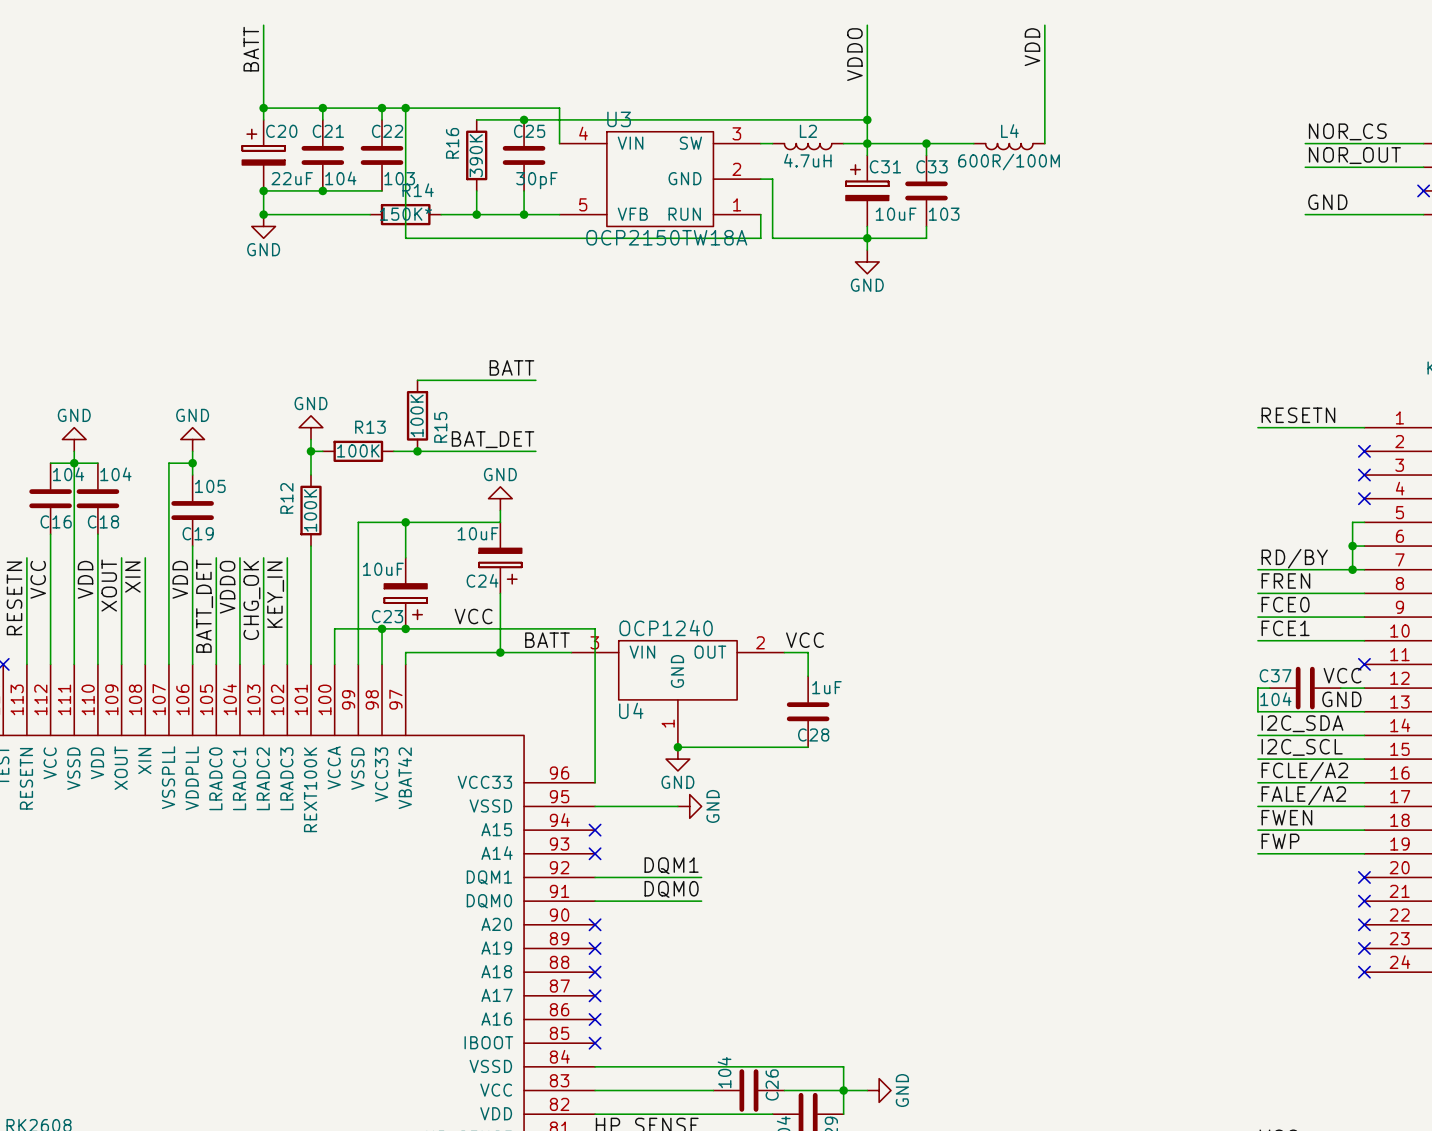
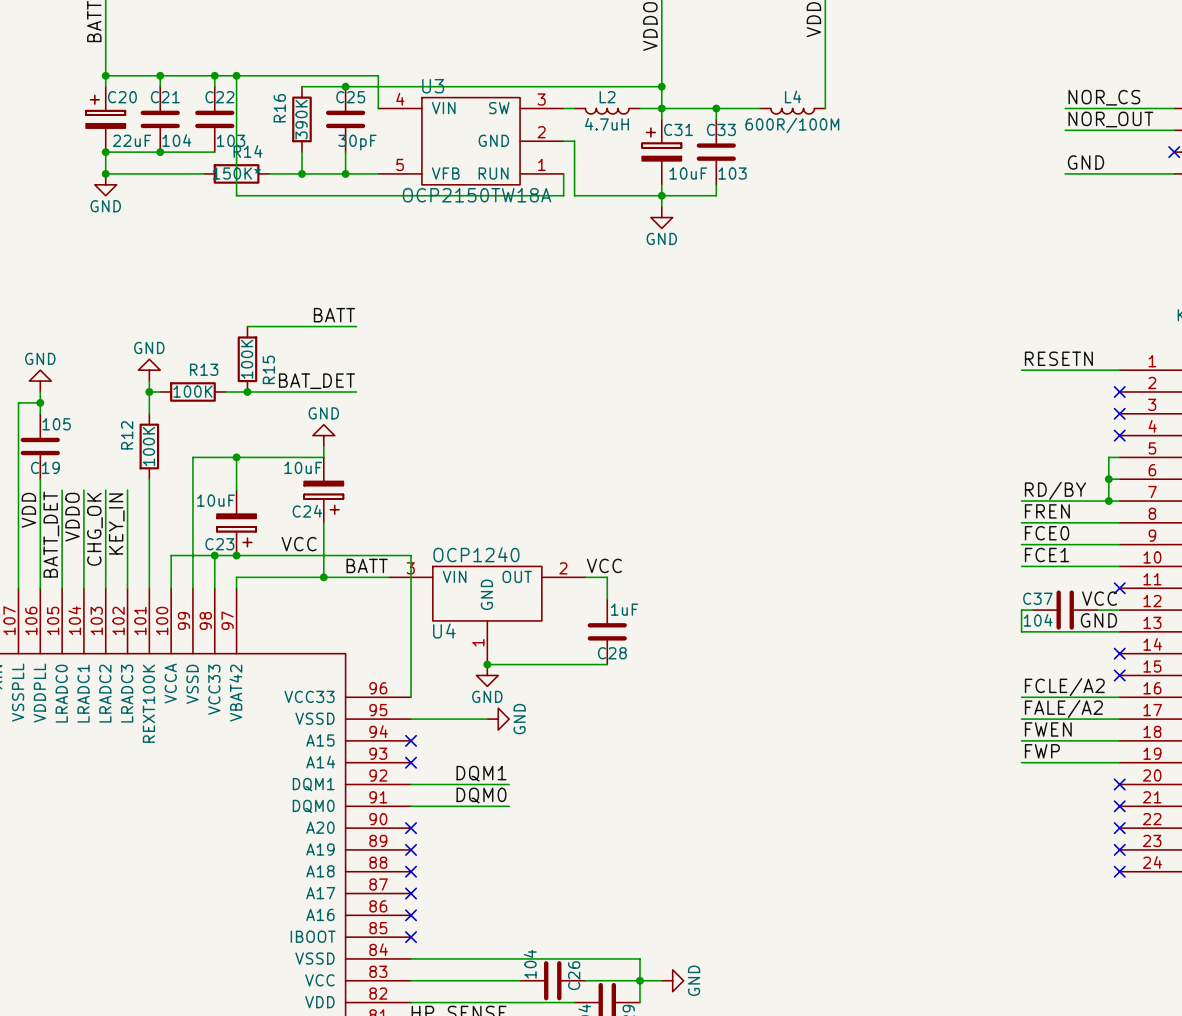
label: I2C_SDA (1302, 723) -> none
wire: (1257, 735) (1364, 735) -> none
no-connect mark: none -> (1119, 653)
label: I2C_SCL (1302, 747) -> none
wire: (1257, 759) (1364, 759) -> none
no-connect mark: none -> (1119, 675)

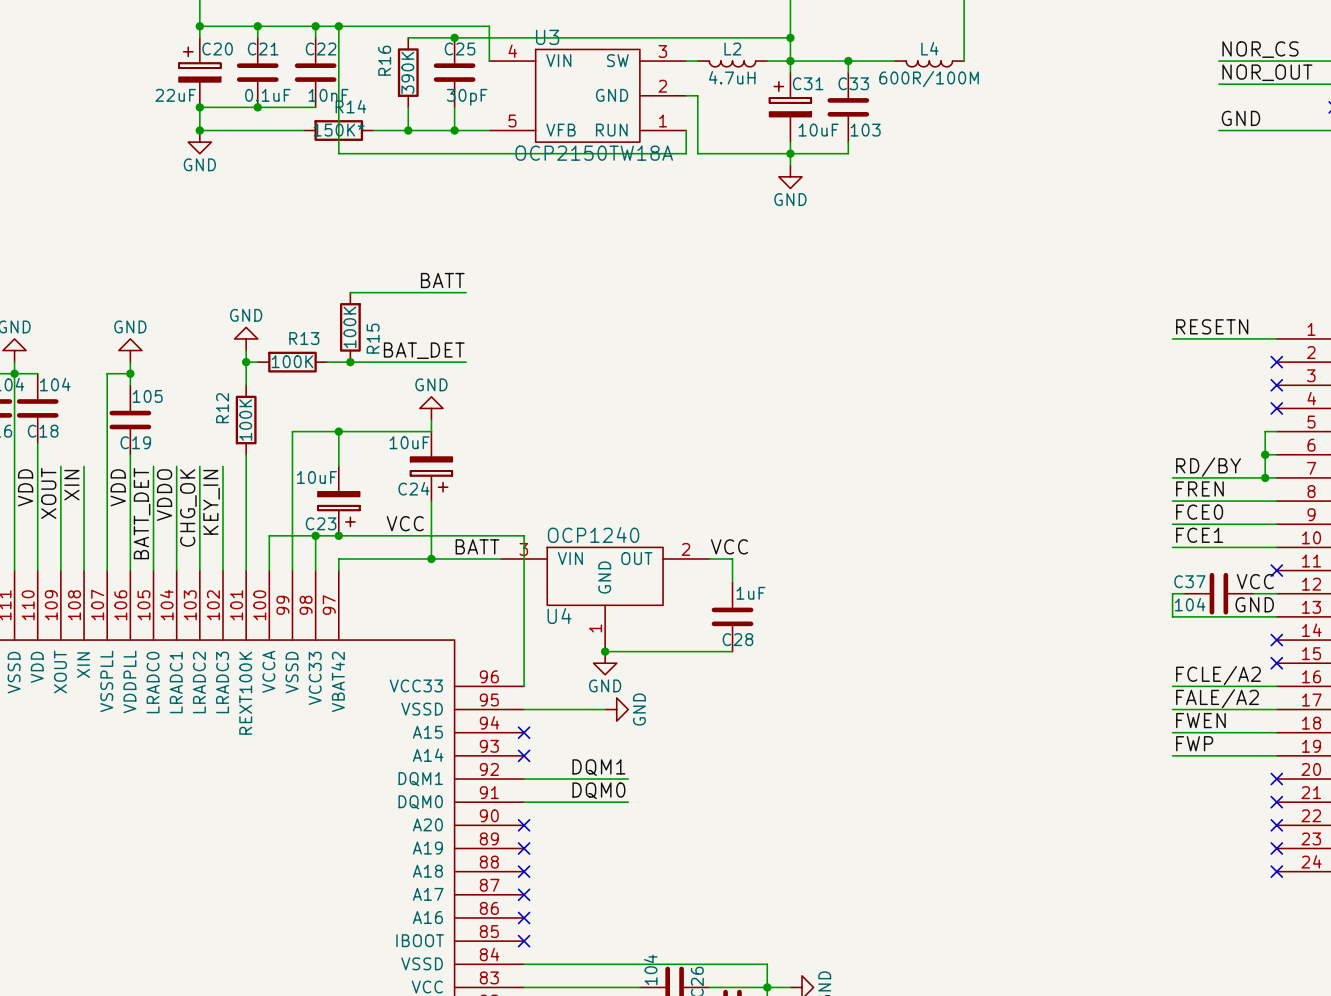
C20 value position: 22uF (132, 140) -> 22uF (175, 95)
C21 value: 104 (176, 140) -> 0.1uF (267, 95)
C22 value: 103 (231, 140) -> 10nF (328, 95)

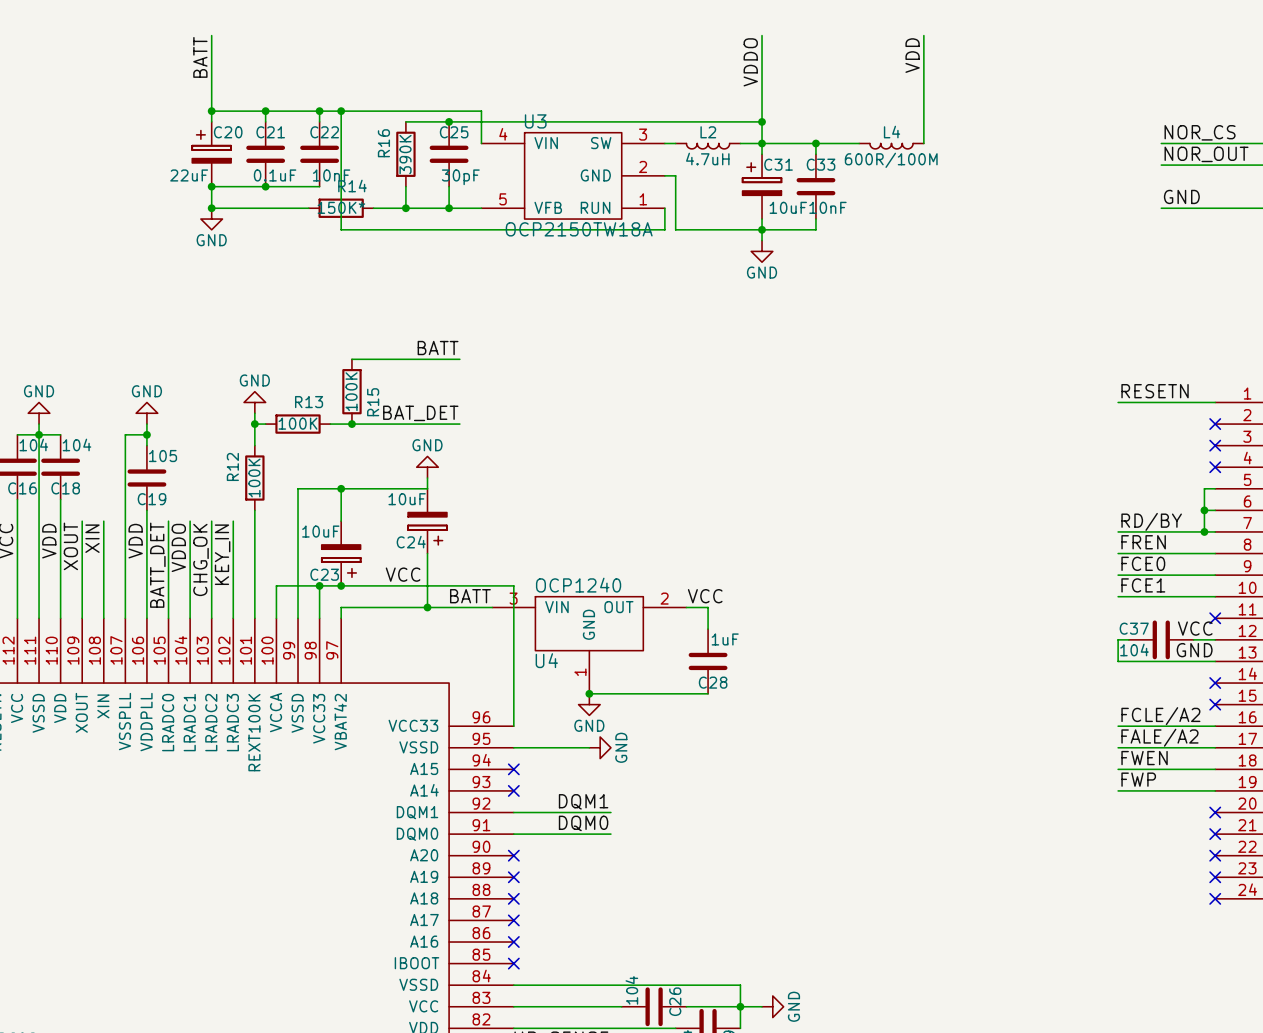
C33 value: 103 (865, 130) -> 10nF (827, 207)

